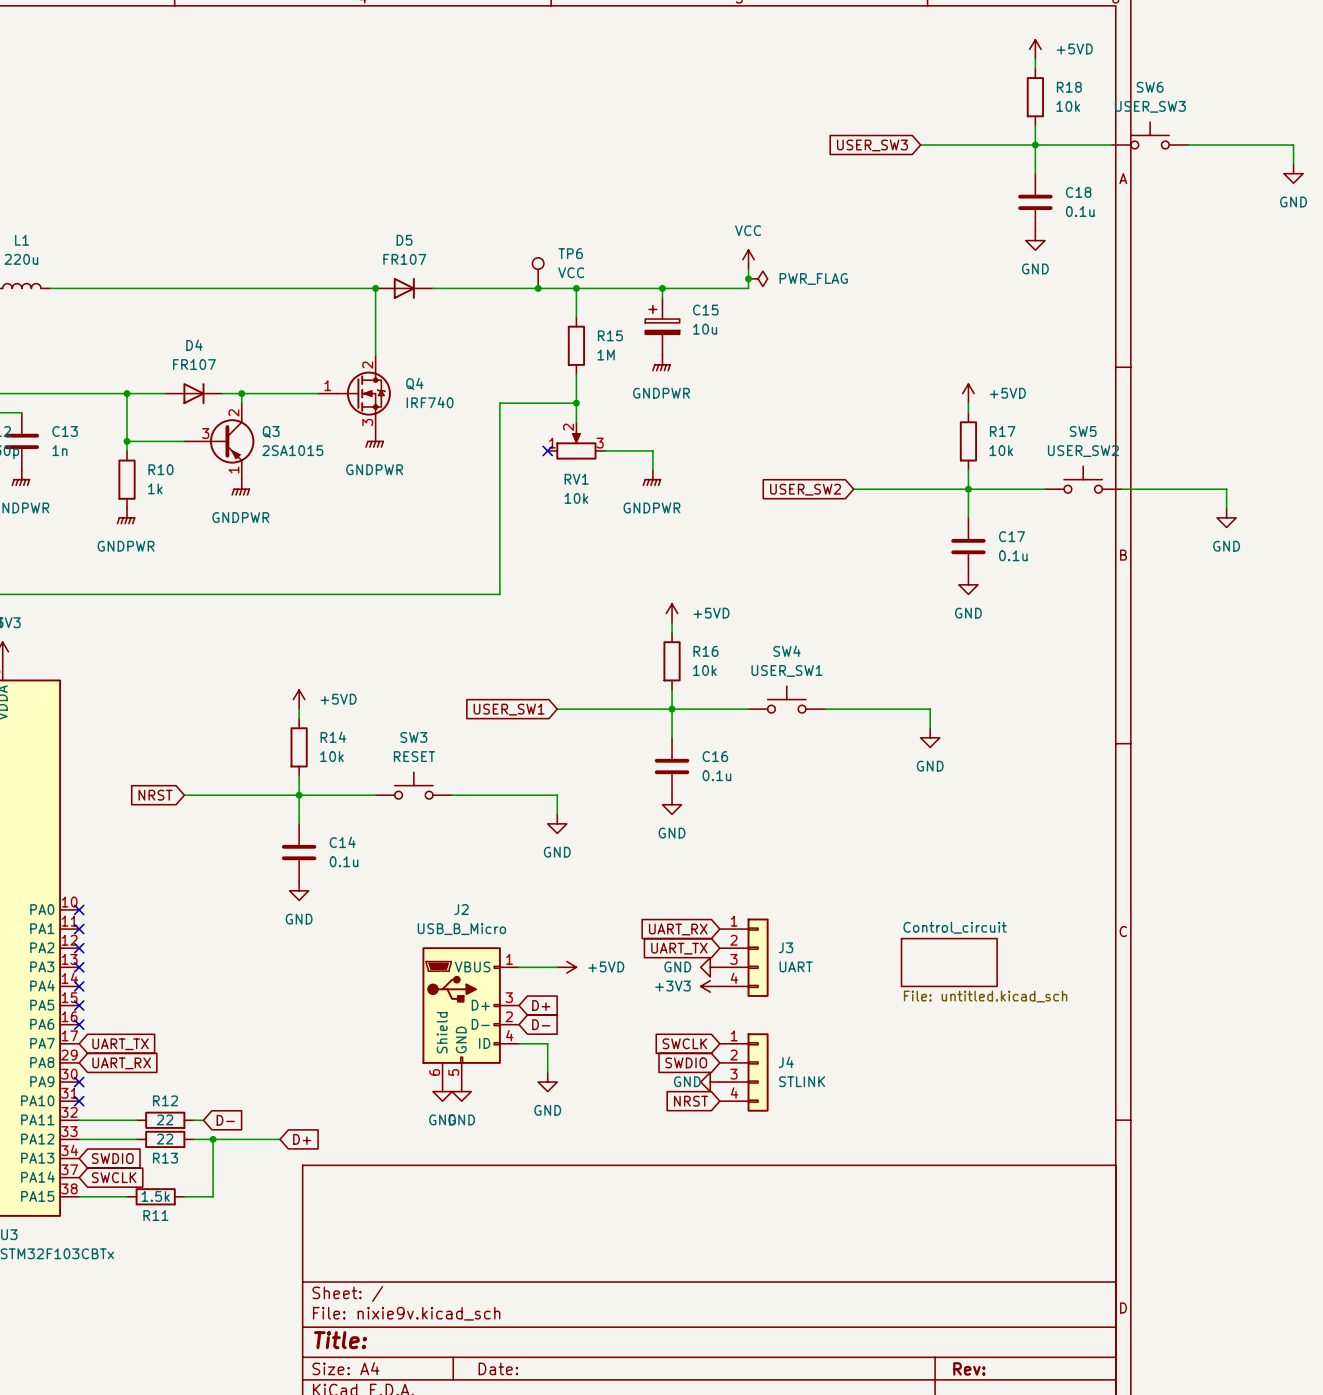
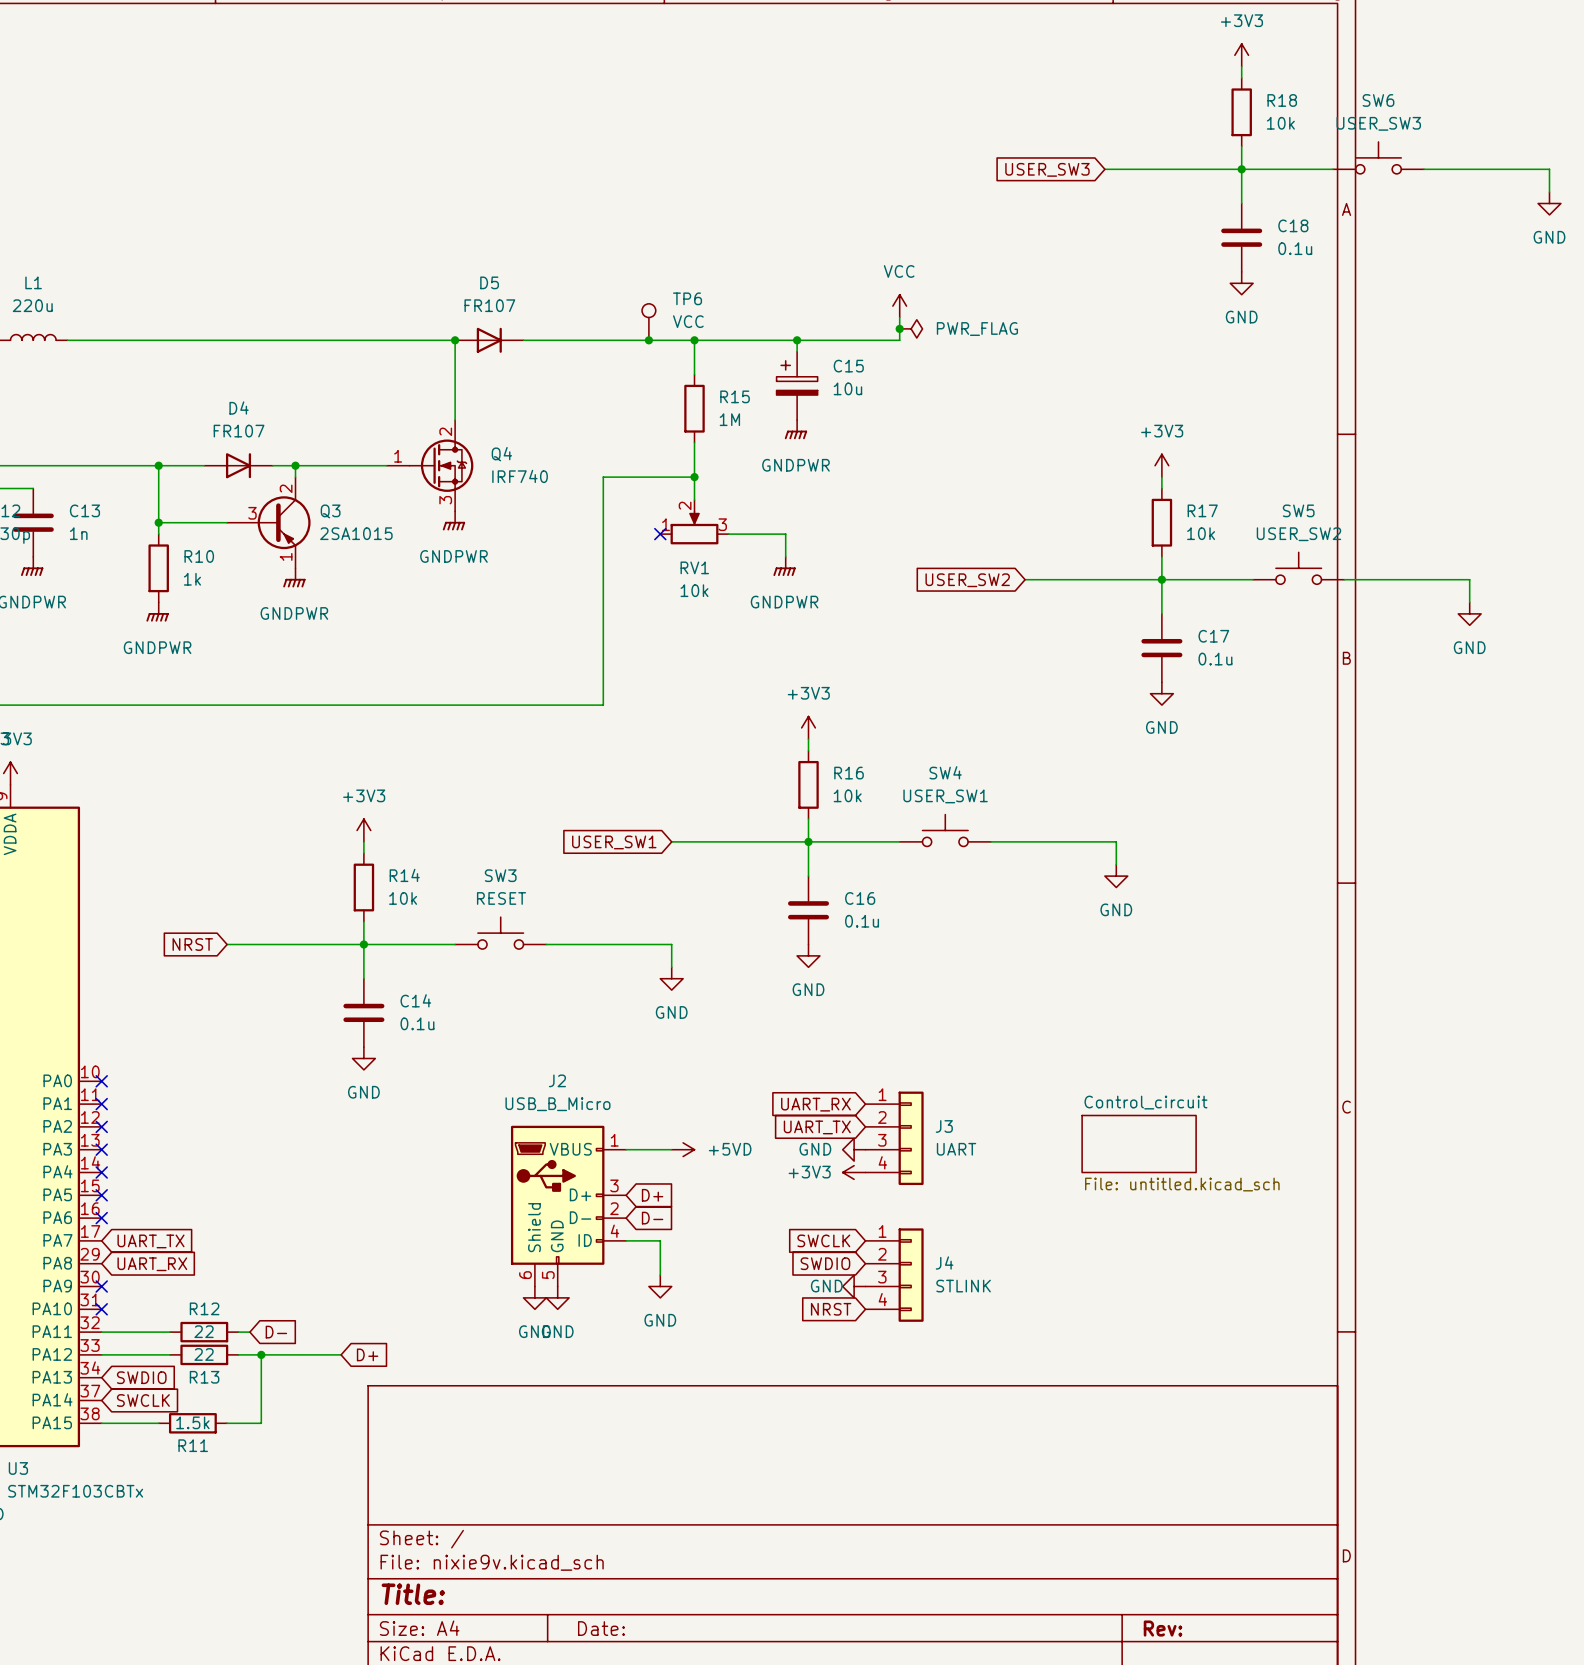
power symbol: +5VD (1035, 49) -> +3V3 (1241, 55)
power symbol: +5VD (968, 393) -> +3V3 (1161, 465)
power symbol: +5VD (672, 613) -> +3V3 (808, 727)
power symbol: +5VD (299, 699) -> +3V3 (363, 830)

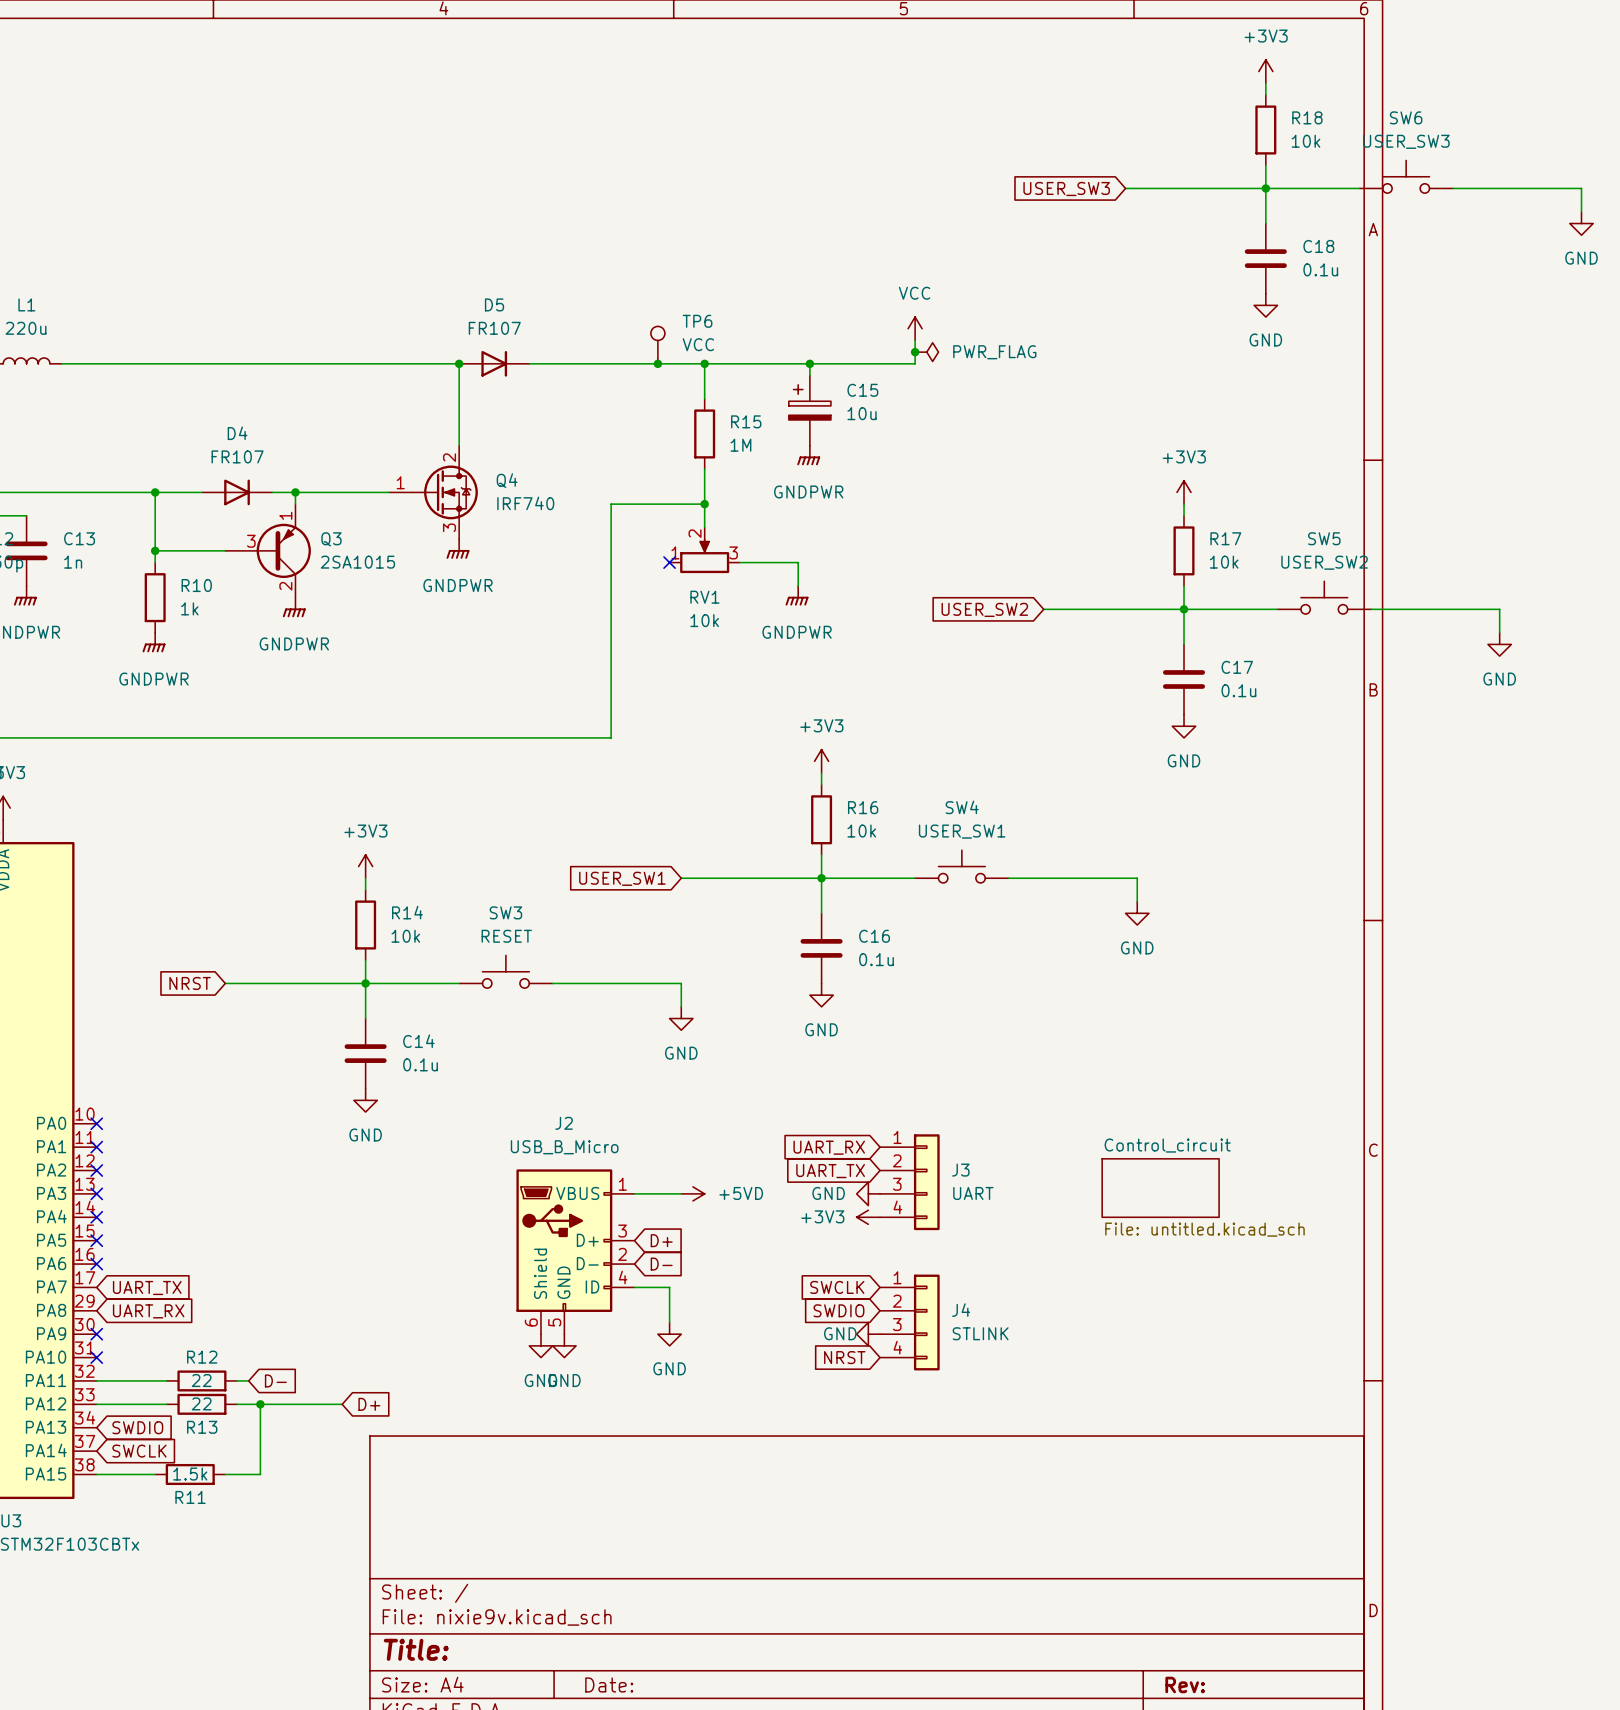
Q3 flip: as is (284, 522) -> up-down (283, 550)

